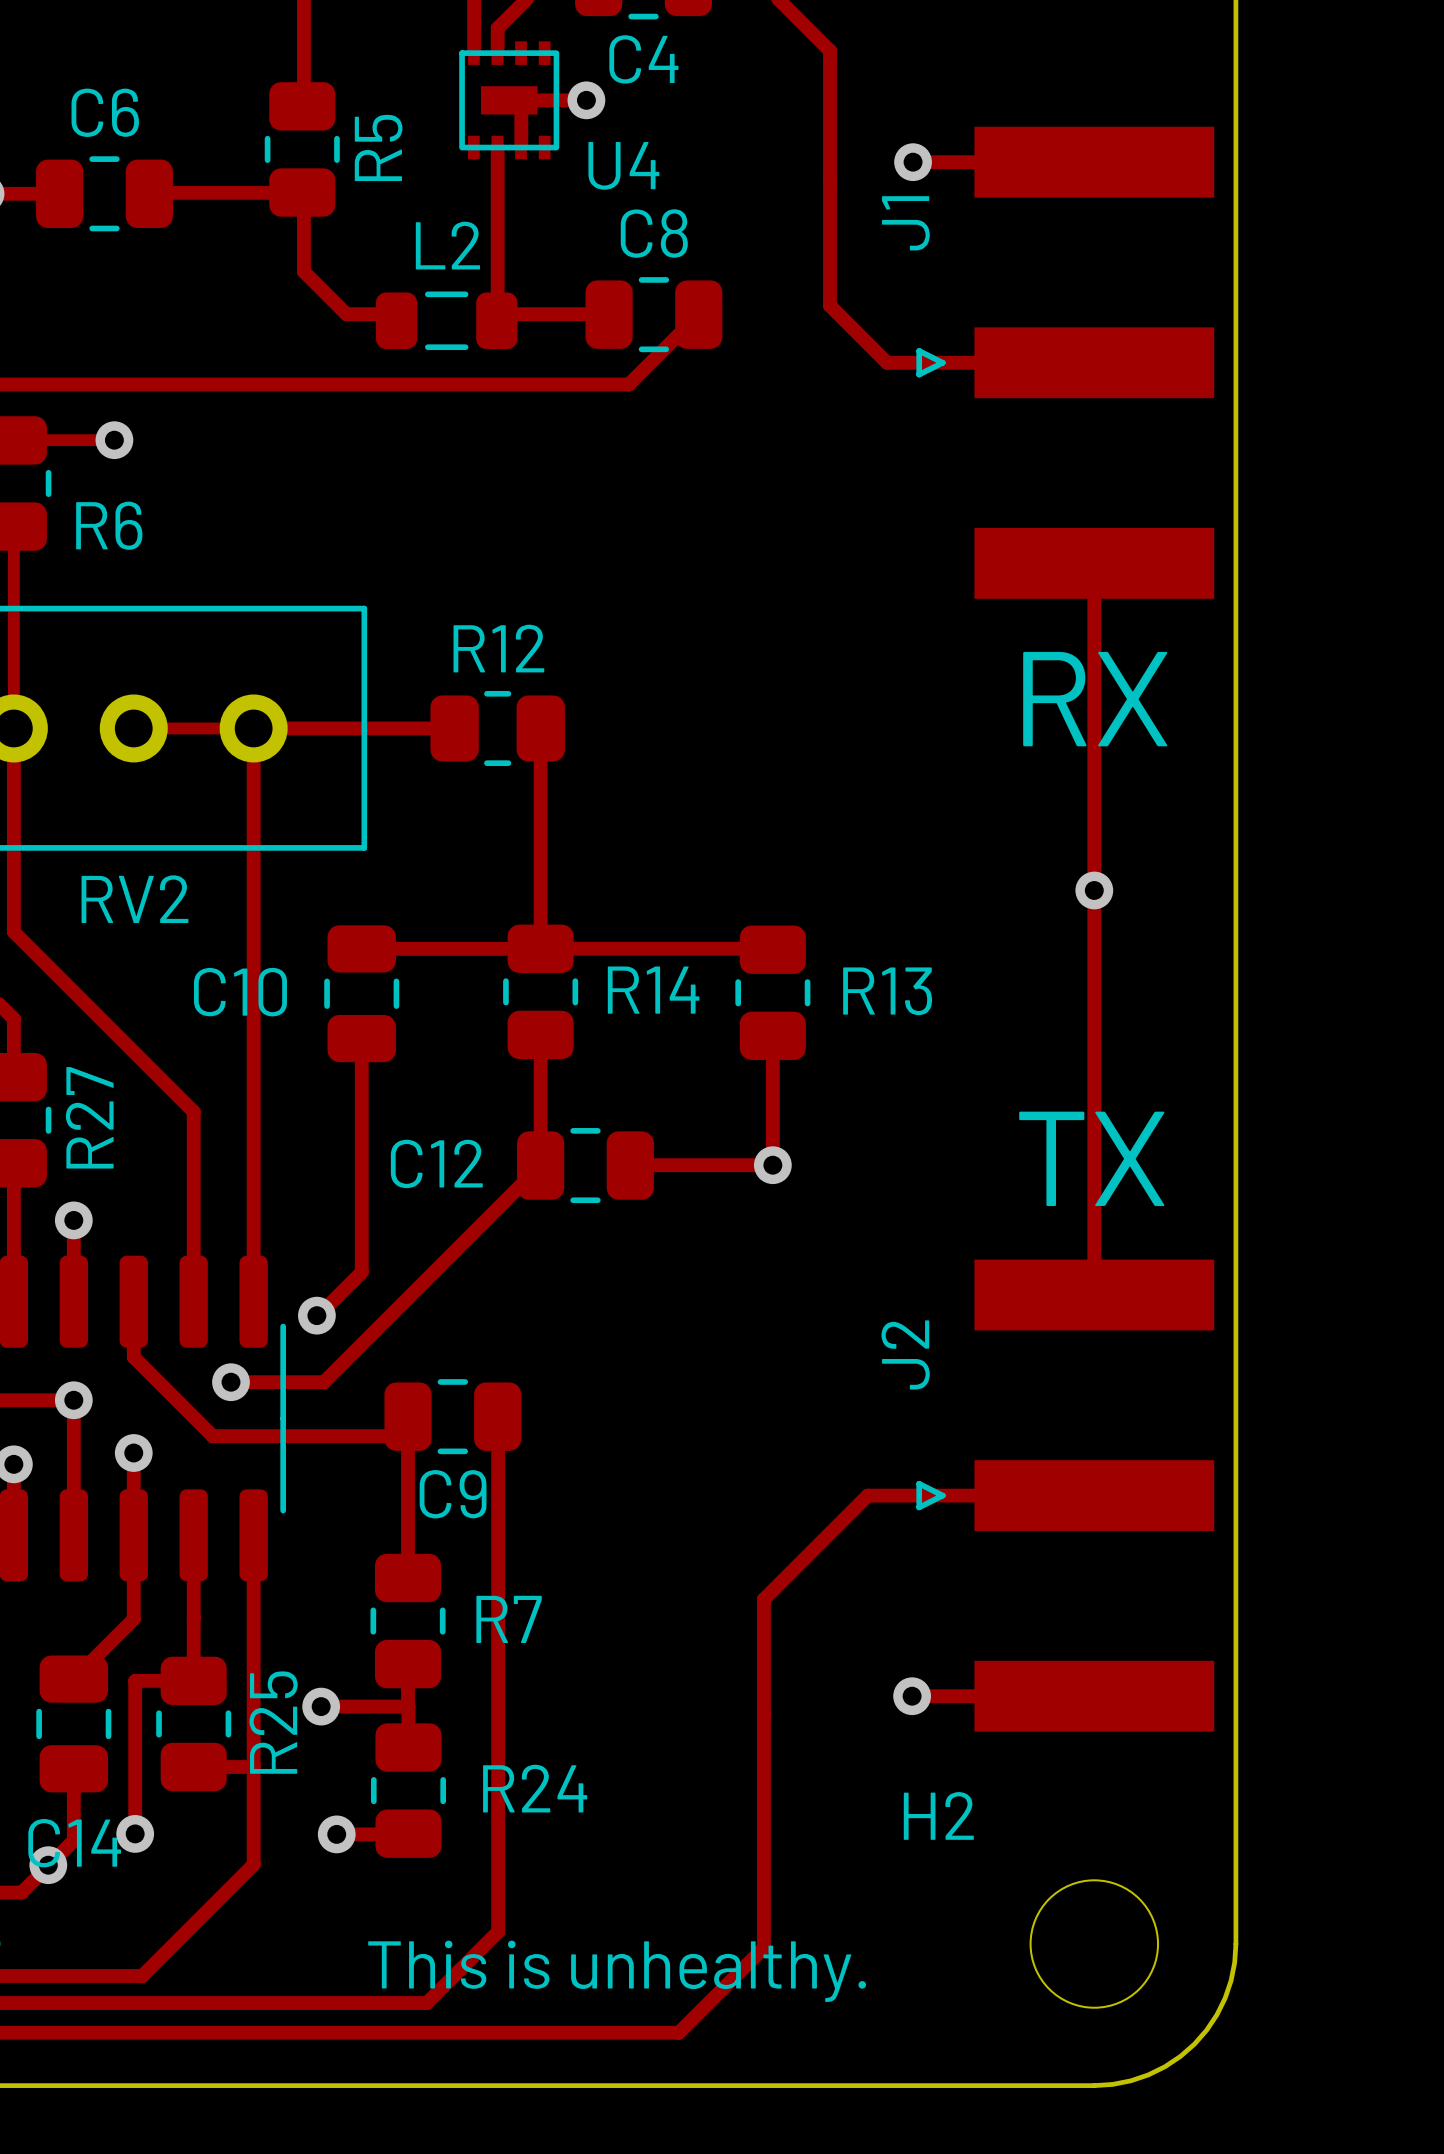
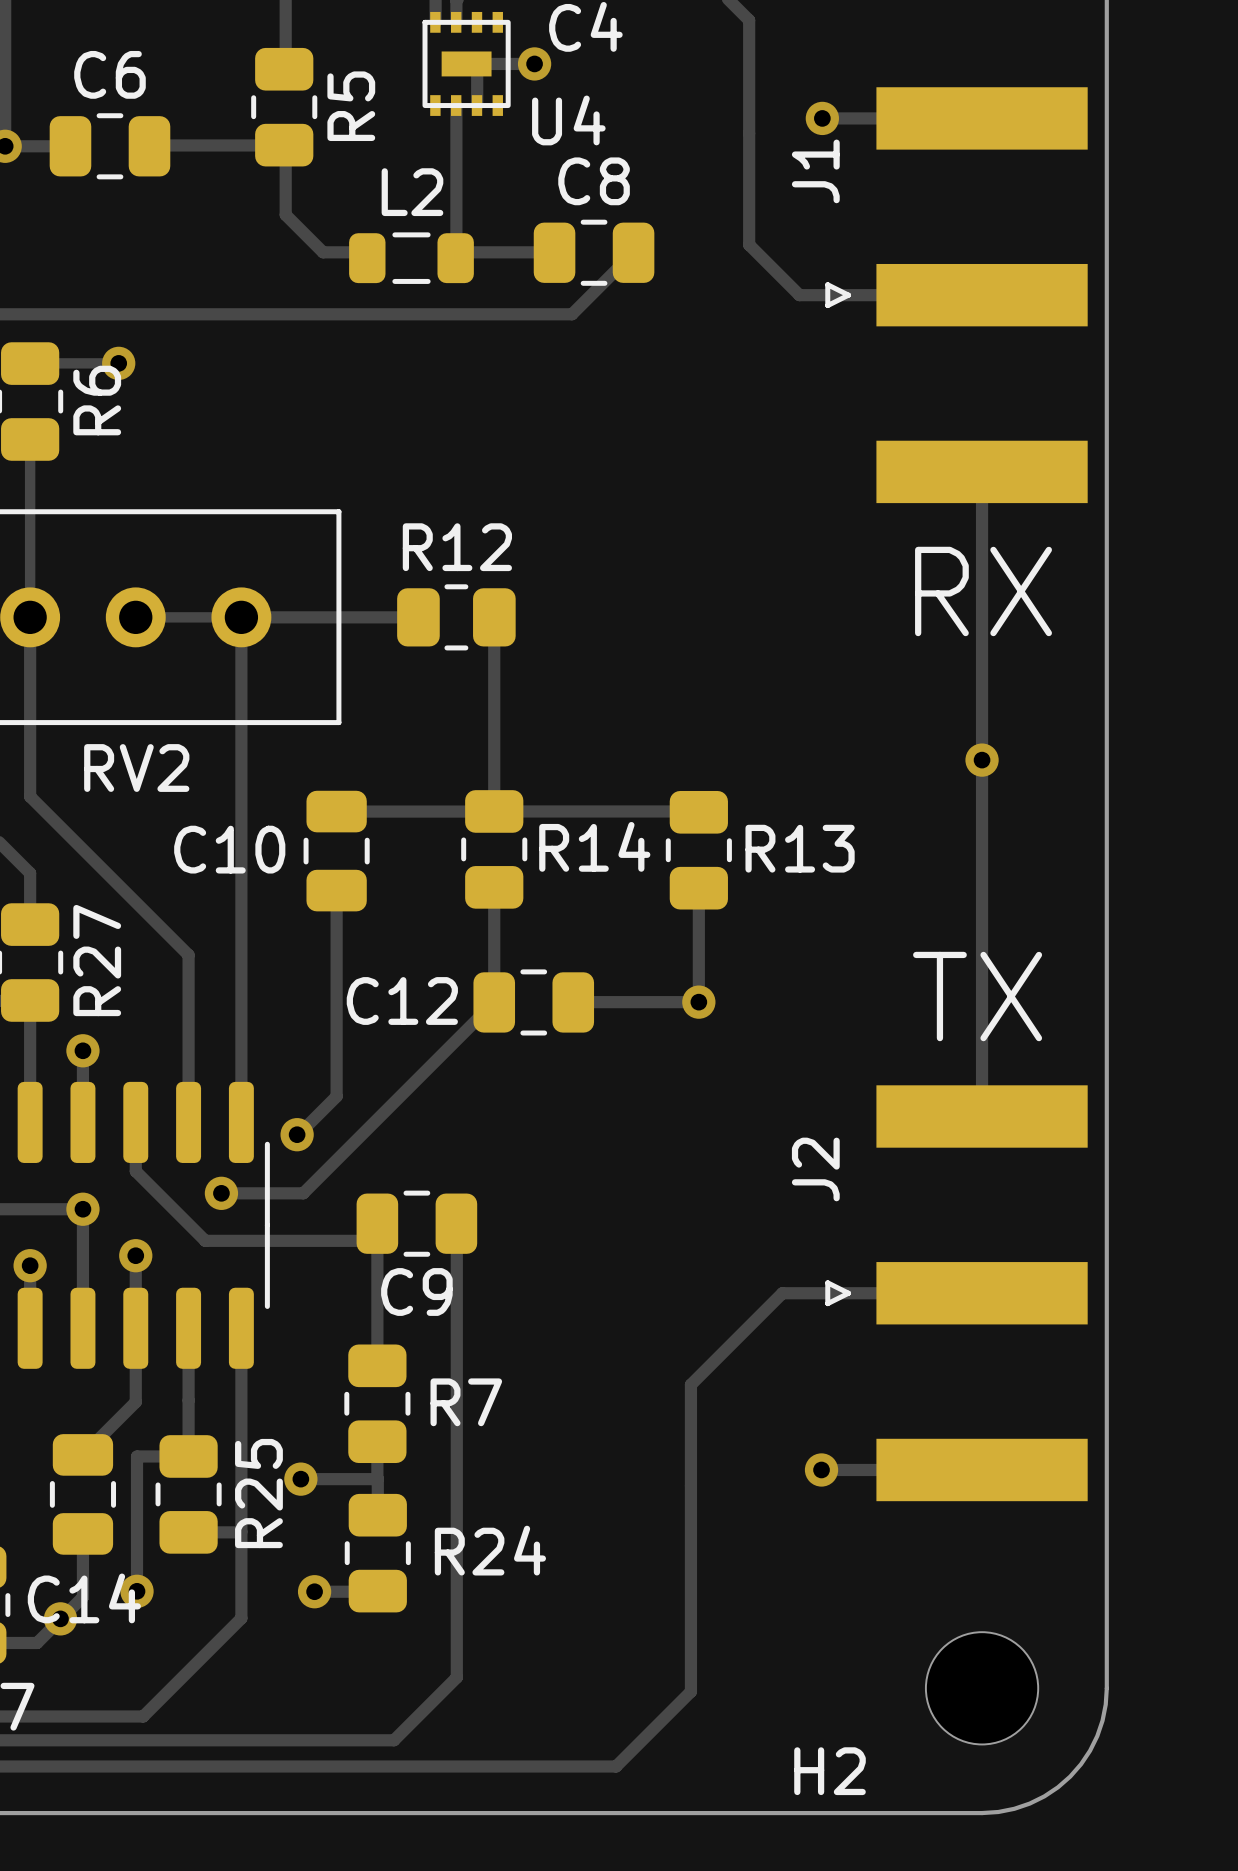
R6 name rotation: 0° (109, 525) -> 90° counterclockwise (97, 400)
H2 name position: H2 (938, 1815) -> H2 (830, 1771)
text: This is unhealthy. (617, 1971) -> none

